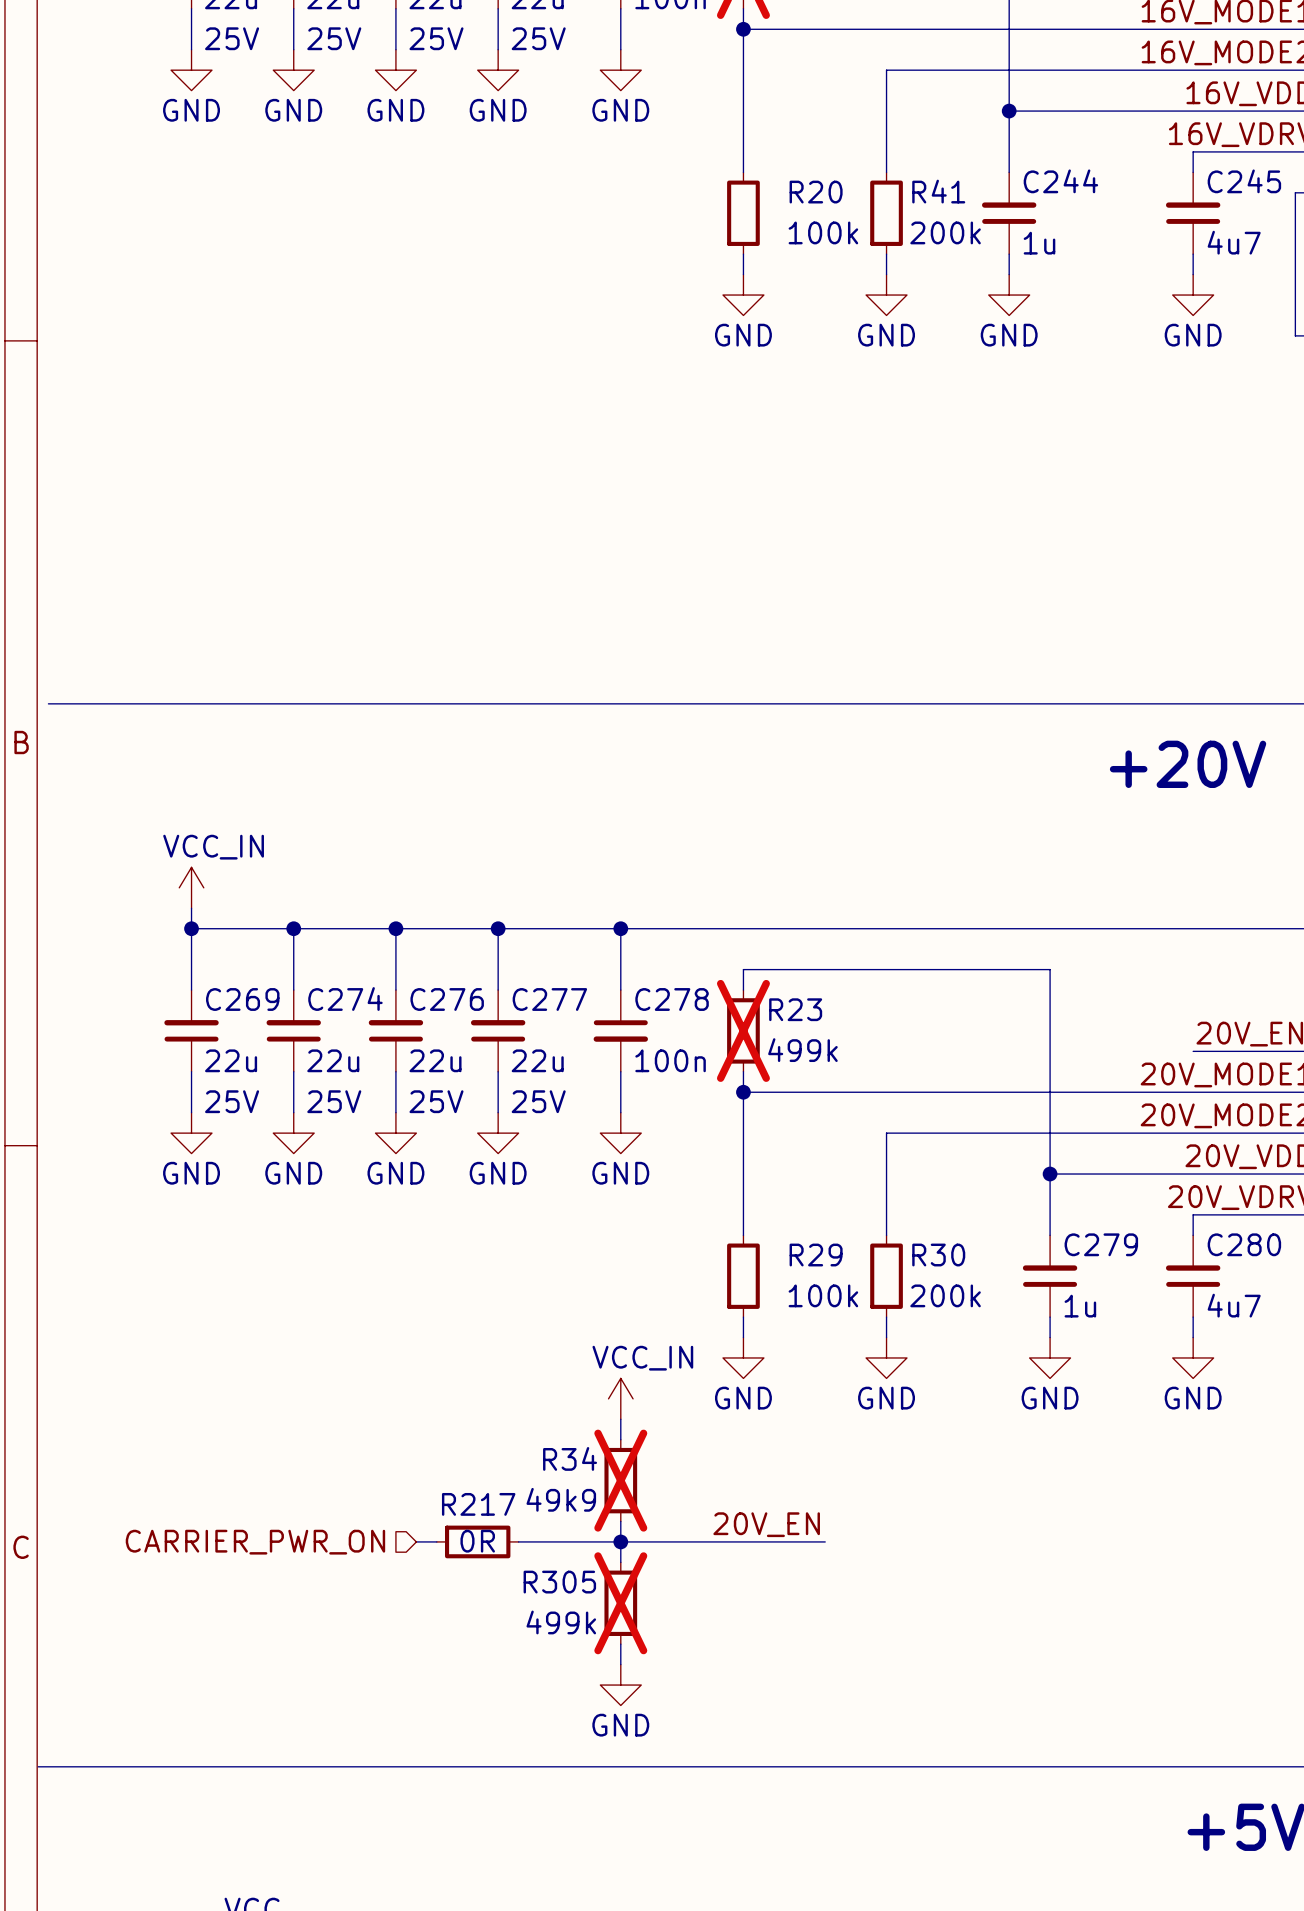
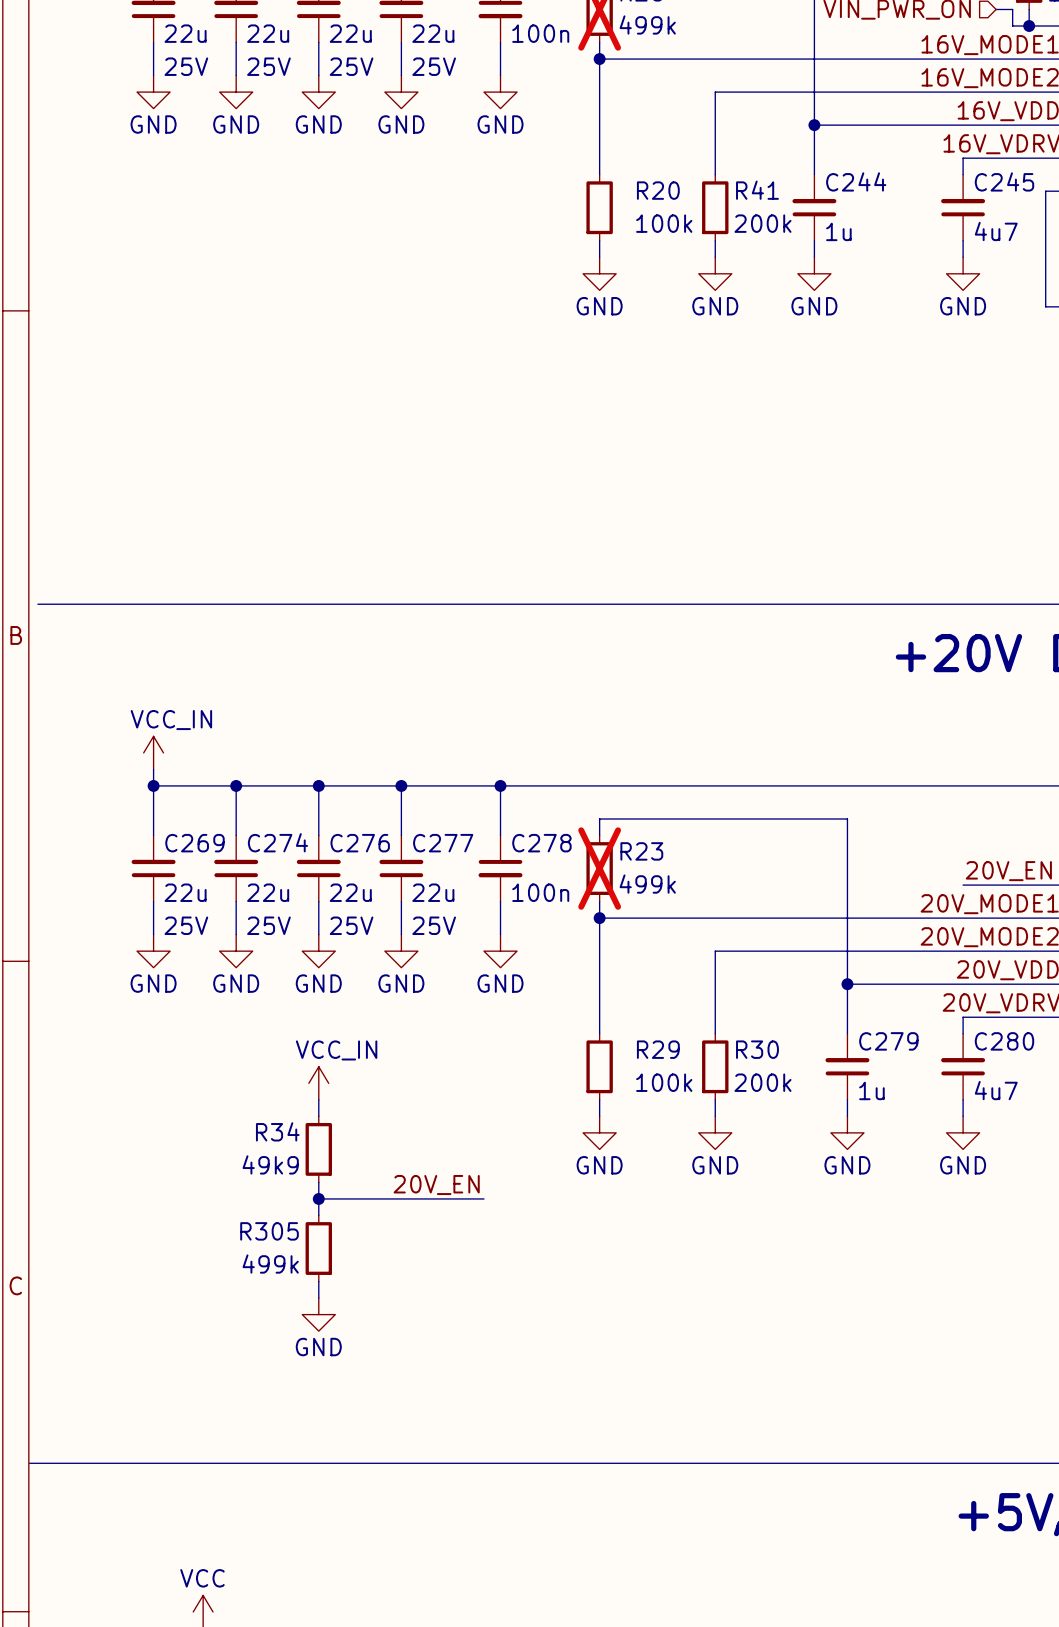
power symbol position: VCC_IN (620, 1398) -> VCC_IN (318, 1083)
wire: (620, 1419) (620, 1439) -> (318, 1099) (318, 1116)
wire: none -> (318, 1198) (483, 1198)
junction: none -> (318, 1198)
R34 position: (620, 1480) -> (318, 1149)
R34 do-not-place cross: (620, 1480) -> none
wire: (620, 1521) (620, 1562) -> (318, 1182) (318, 1215)
label position: 20V_EN (766, 1524) -> 20V_EN (436, 1185)
wire: (416, 1541) (436, 1541) -> none
R217: (477, 1541) -> none
wire: (518, 1541) (825, 1541) -> none
junction: (620, 1541) -> none
hierarchical label: CARRIER_PWR_ON (255, 1542) -> none
R305 position: (620, 1603) -> (318, 1248)
R305 do-not-place cross: (620, 1603) -> none
wire: (620, 1644) (620, 1664) -> (318, 1281) (318, 1298)
power symbol position: GND (620, 1685) -> GND (318, 1314)

